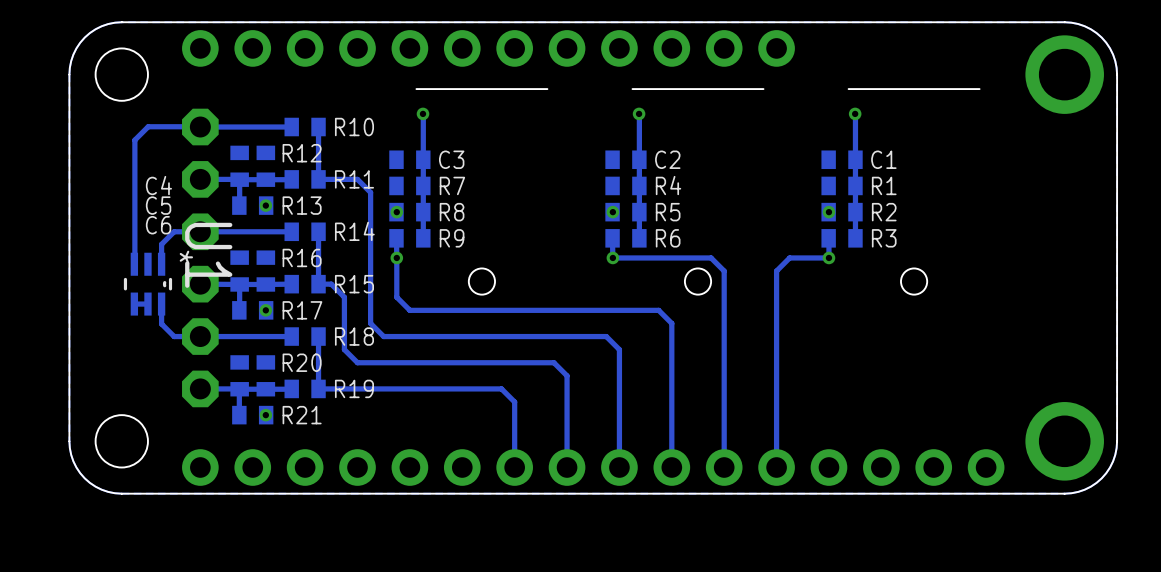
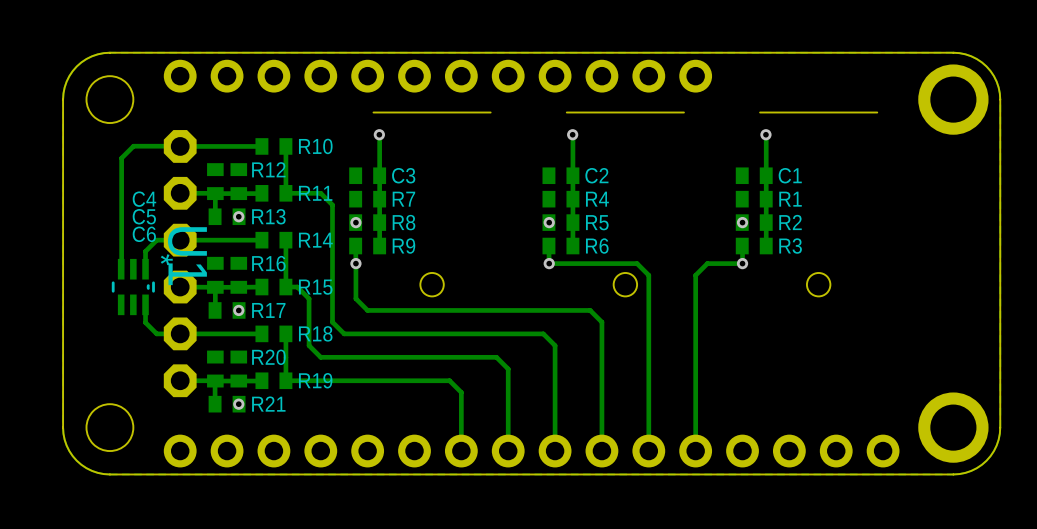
track: (147, 304) (134, 304) -> none

